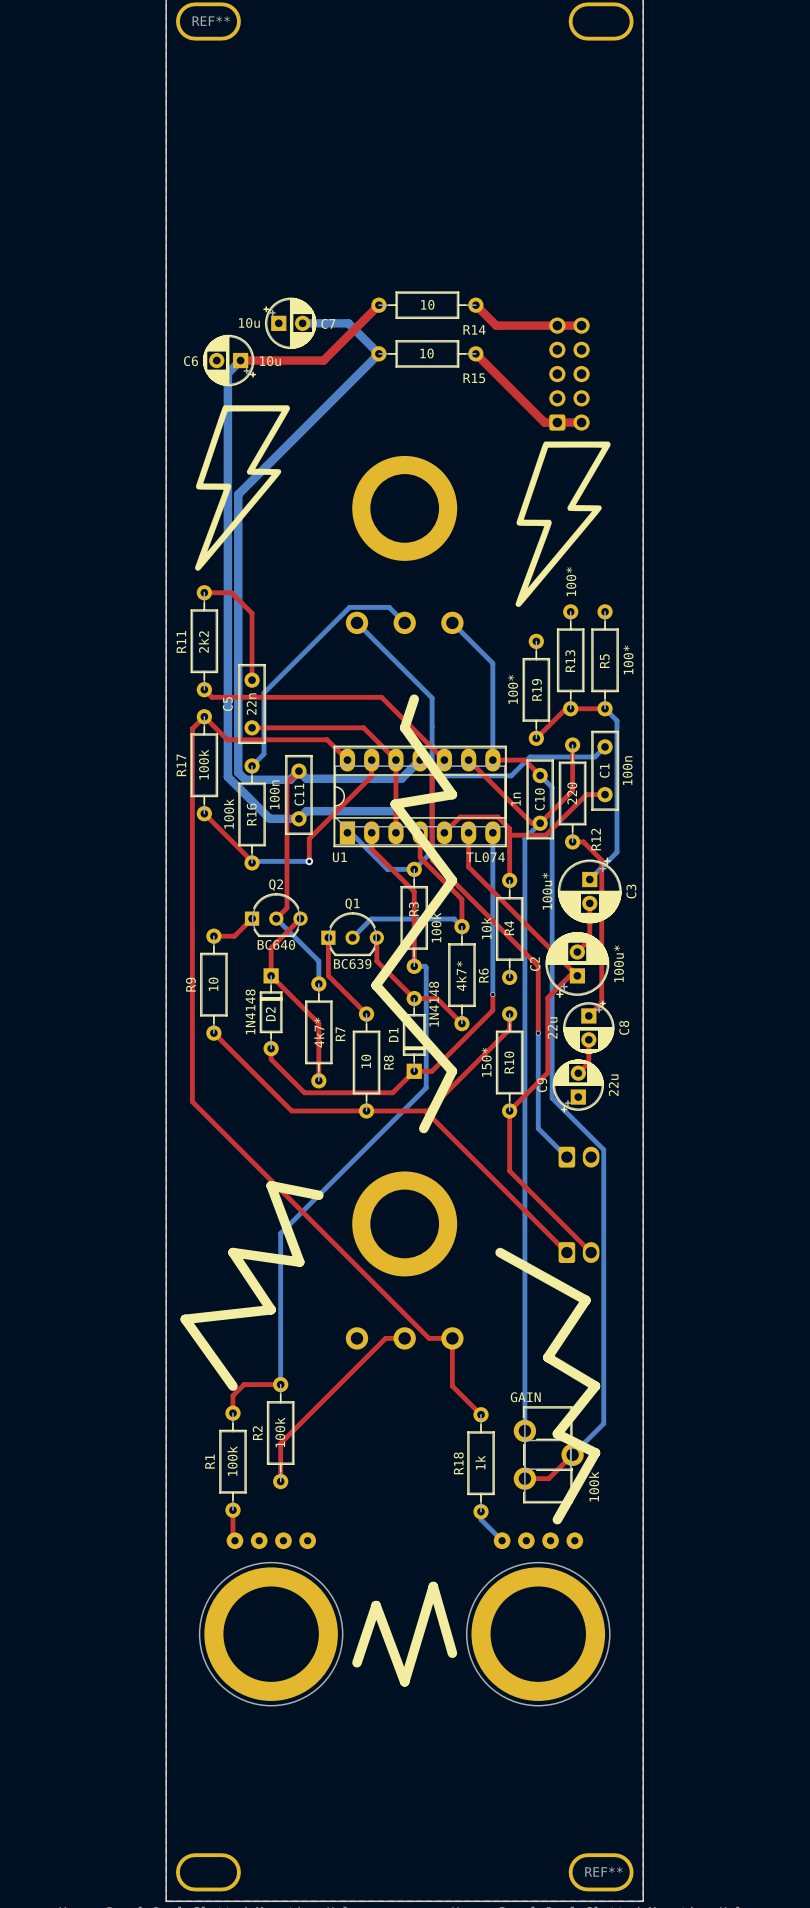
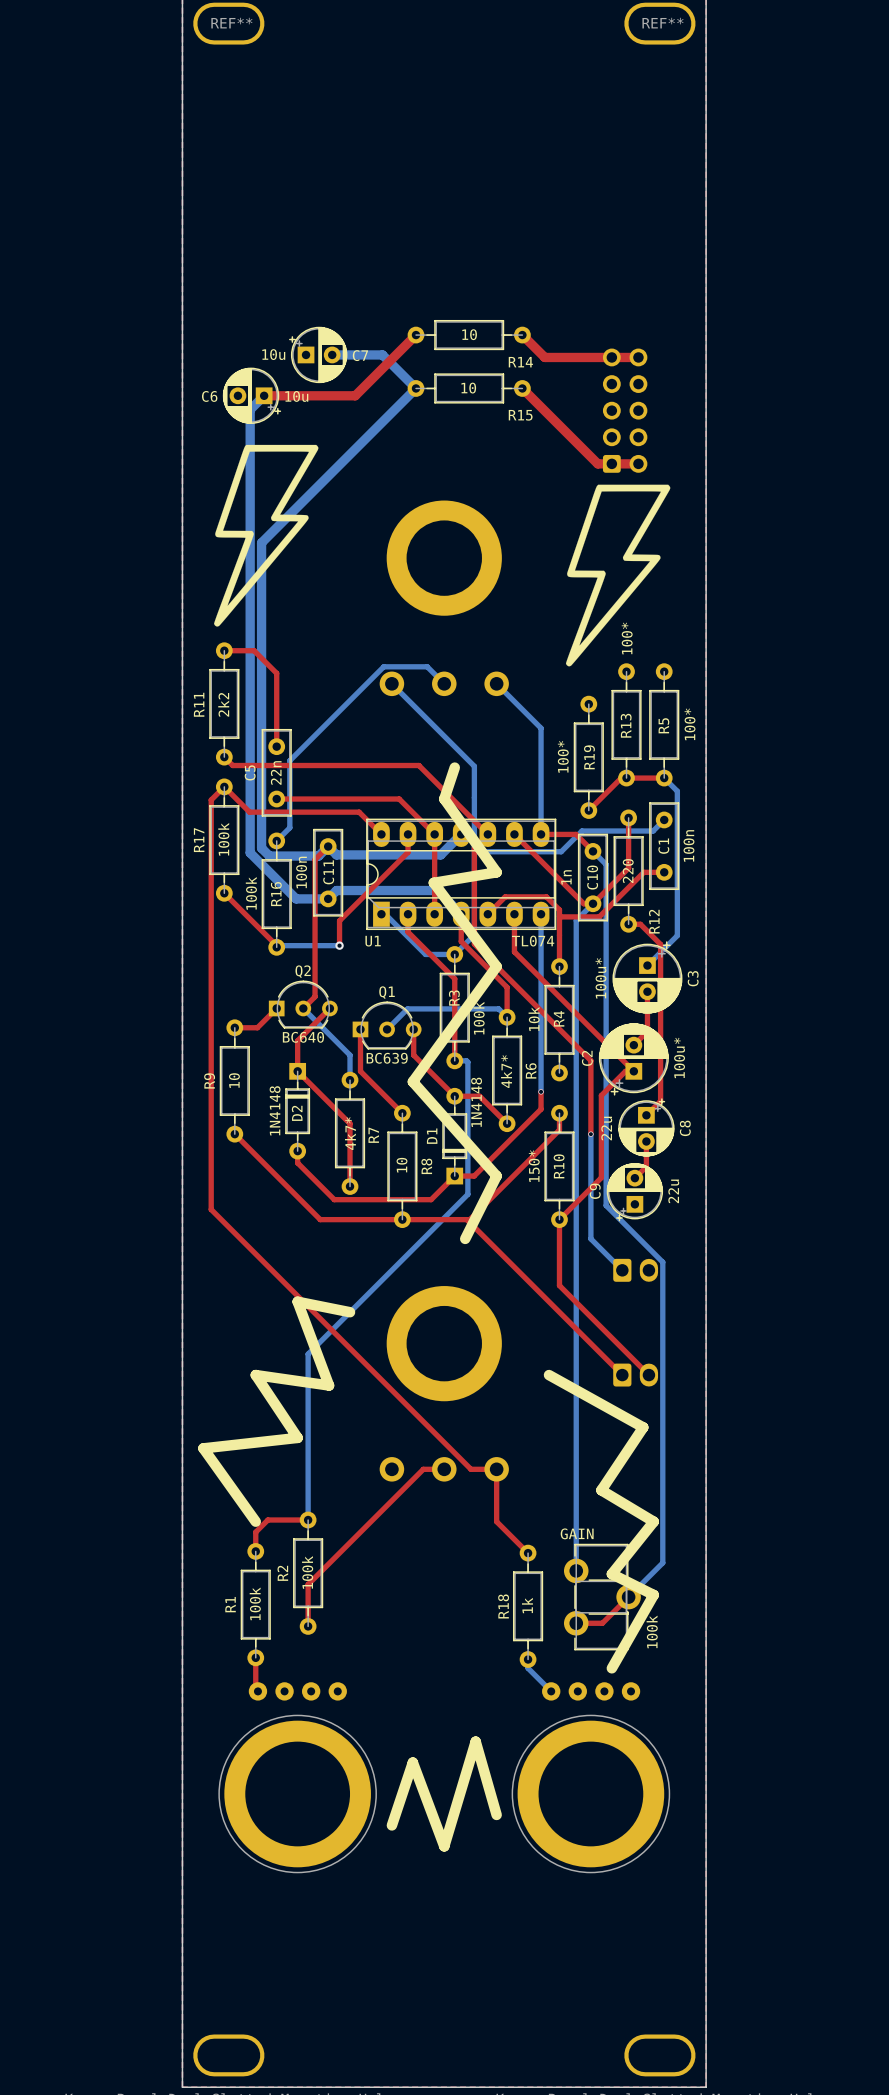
REF** name position: REF** (603, 1871) -> REF** (662, 23)

